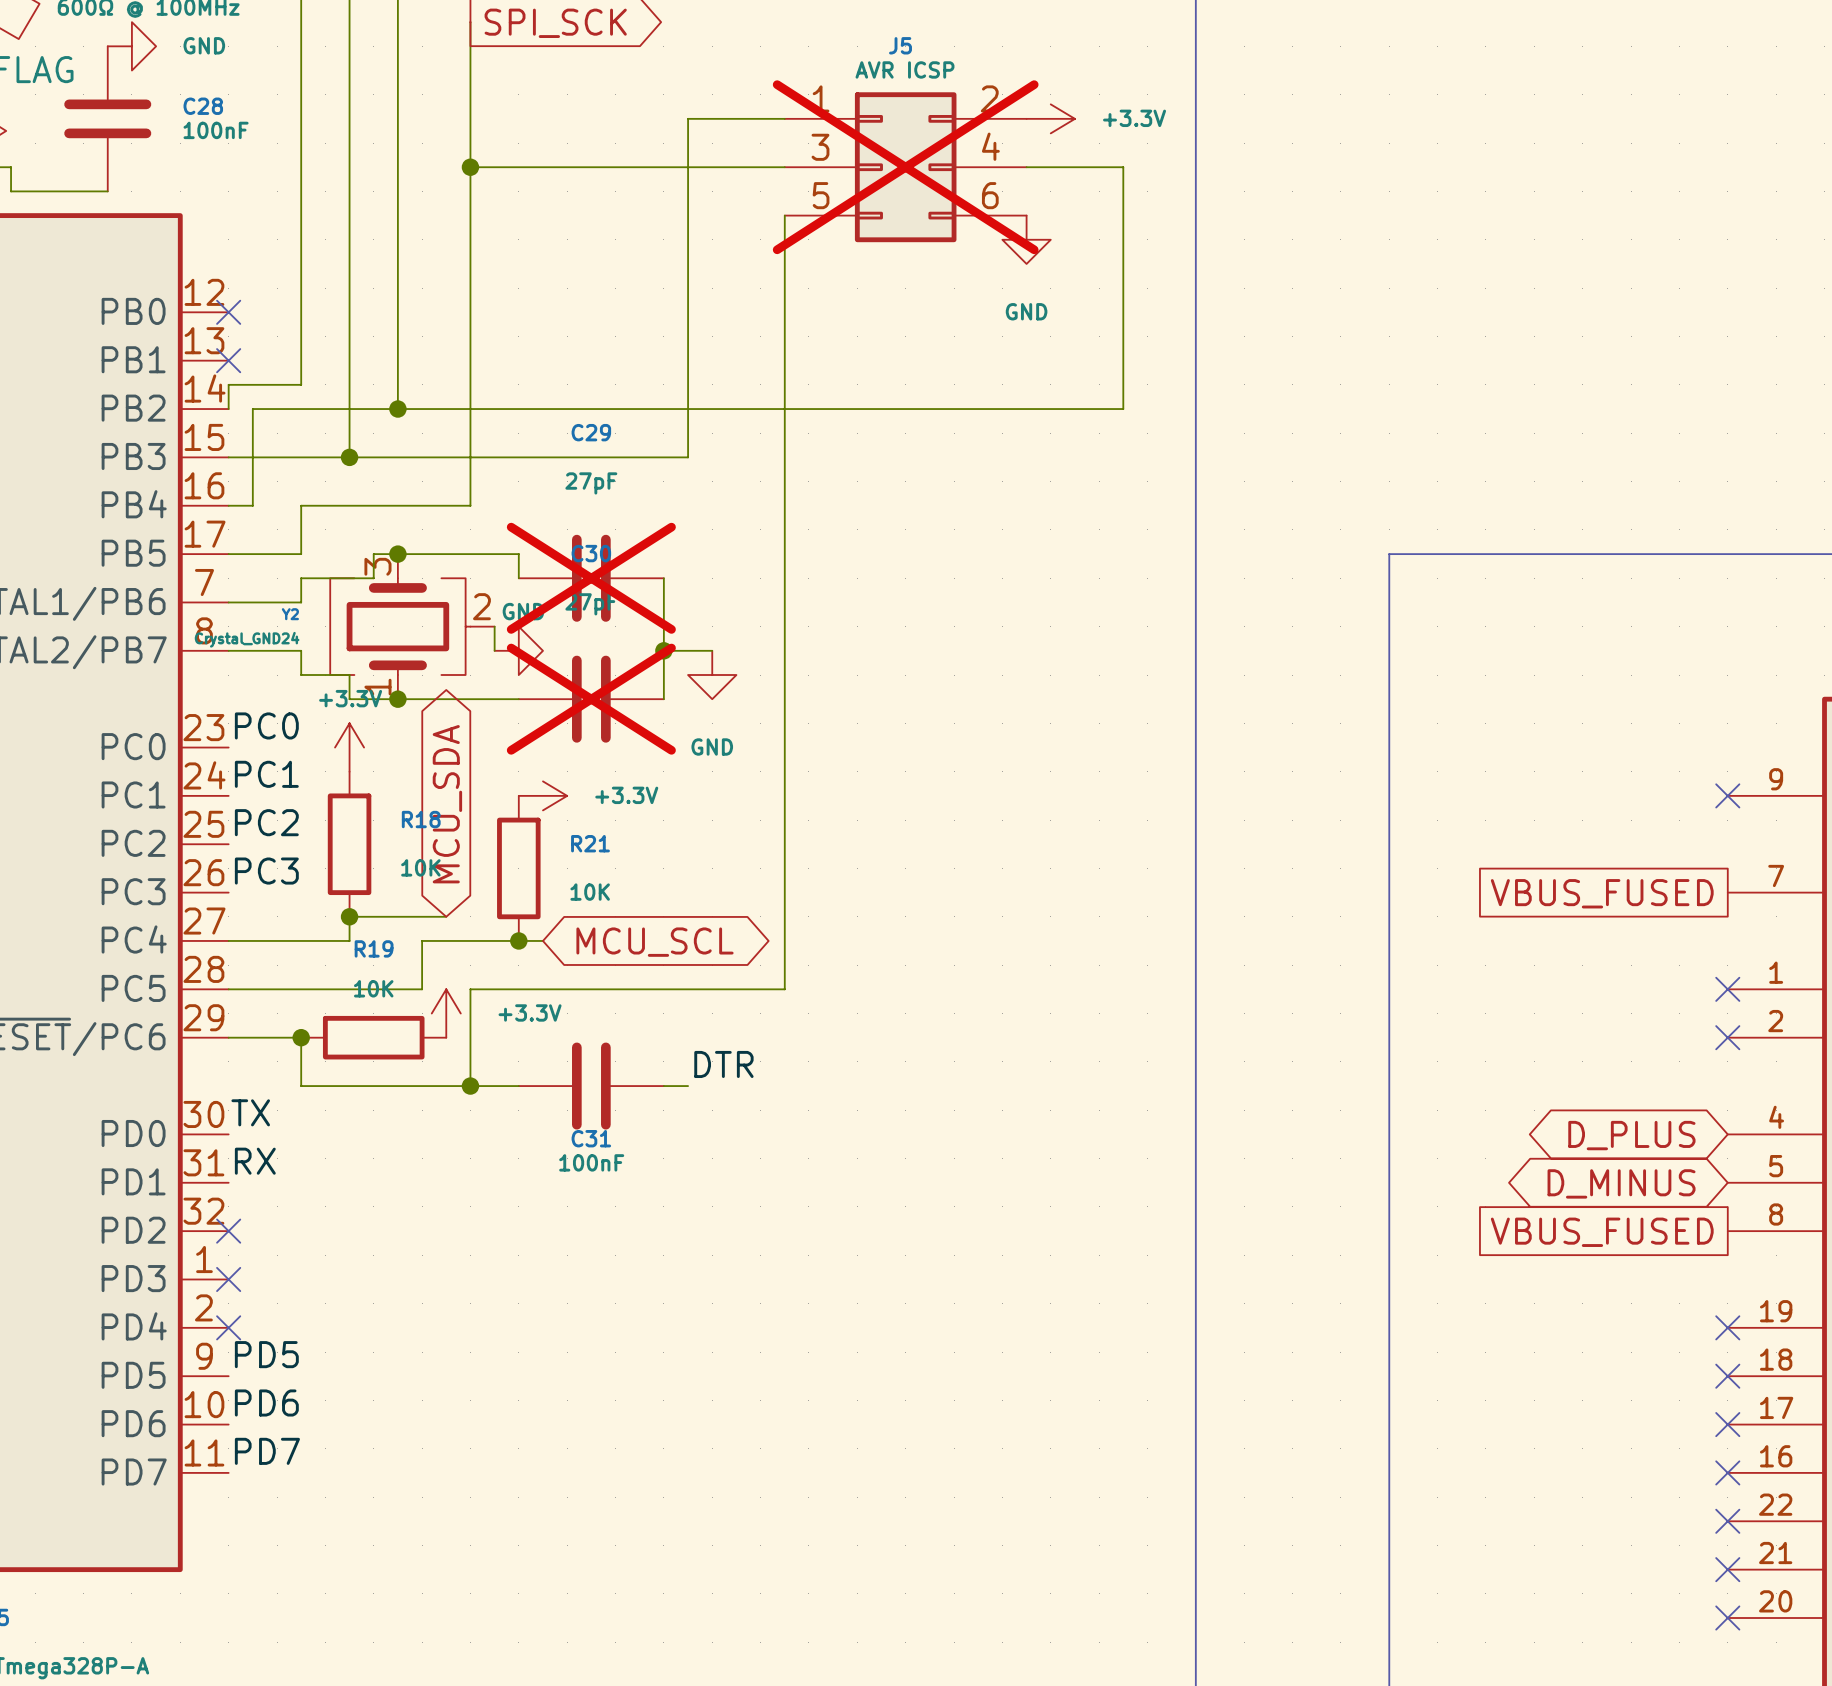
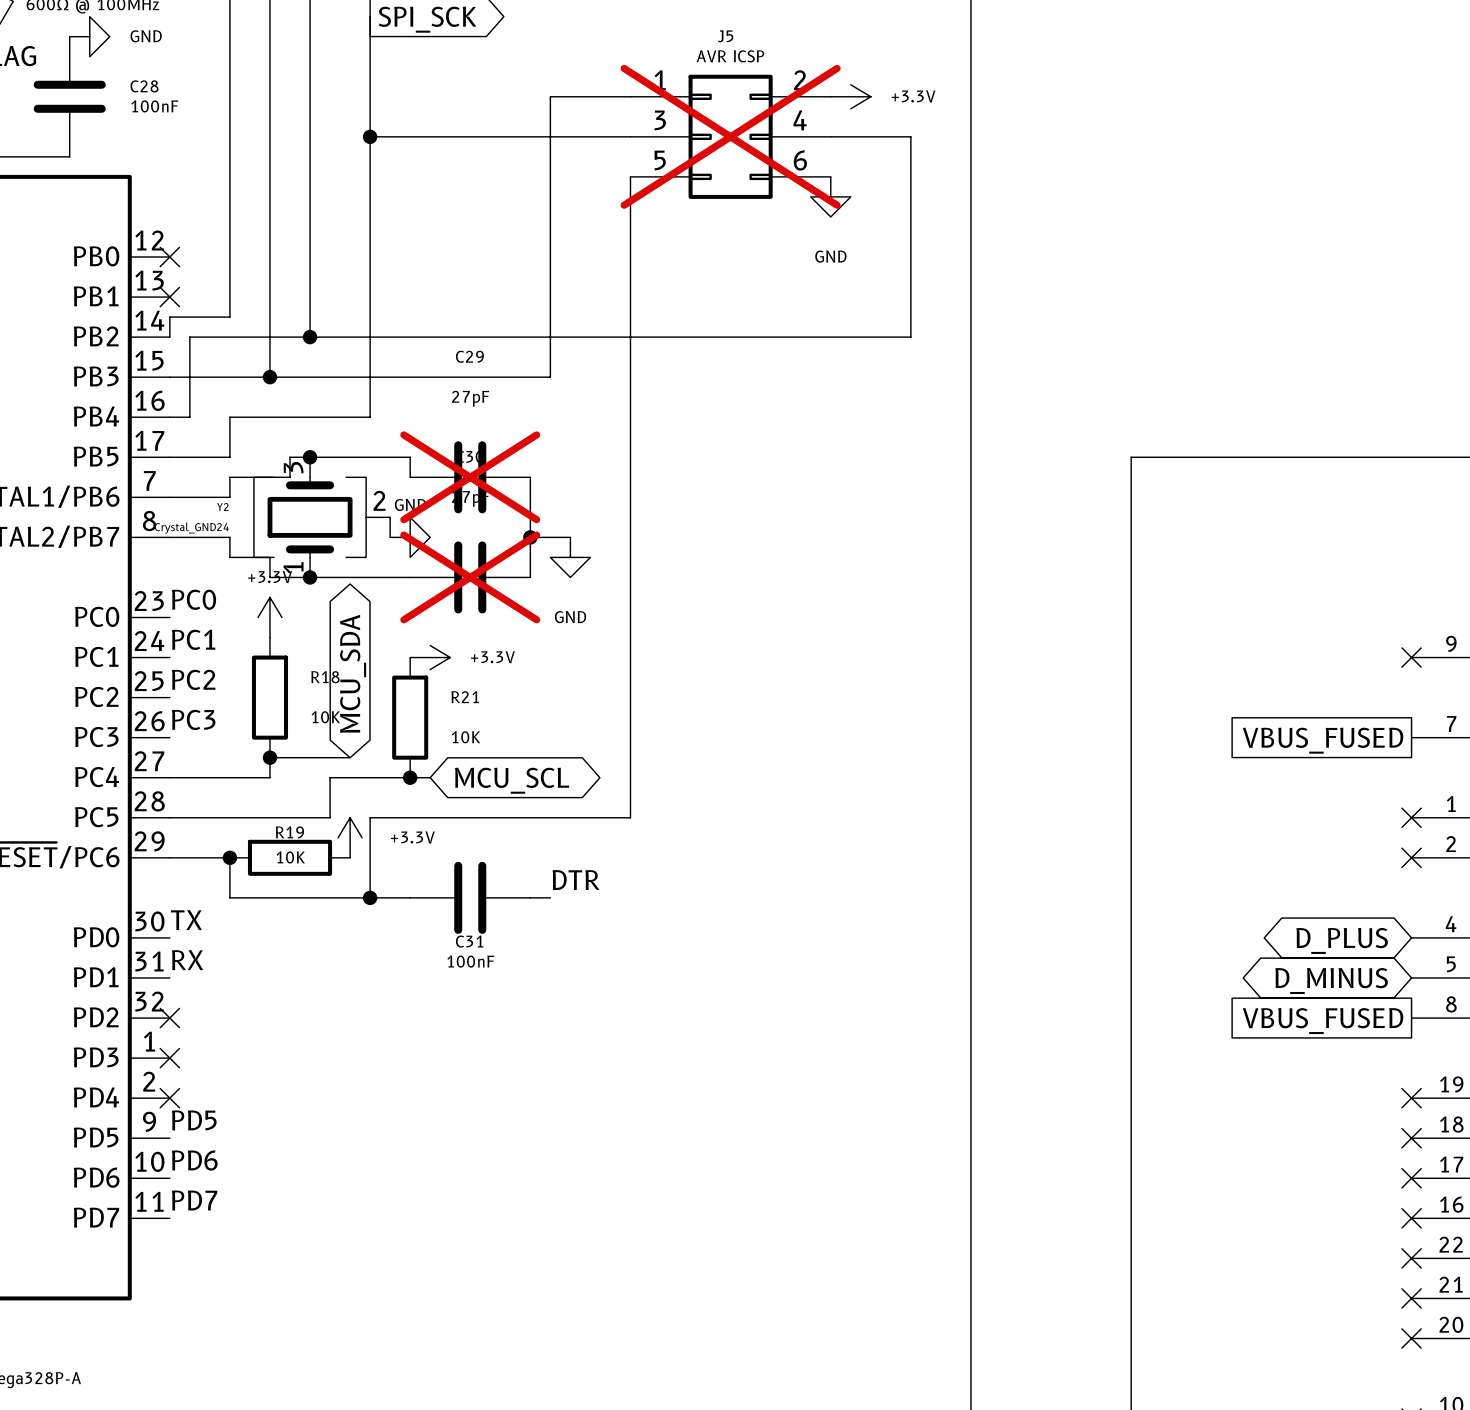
R19 name position: R19 (374, 948) -> R19 (289, 832)
R19 value position: 10K (373, 988) -> 10K (290, 857)

